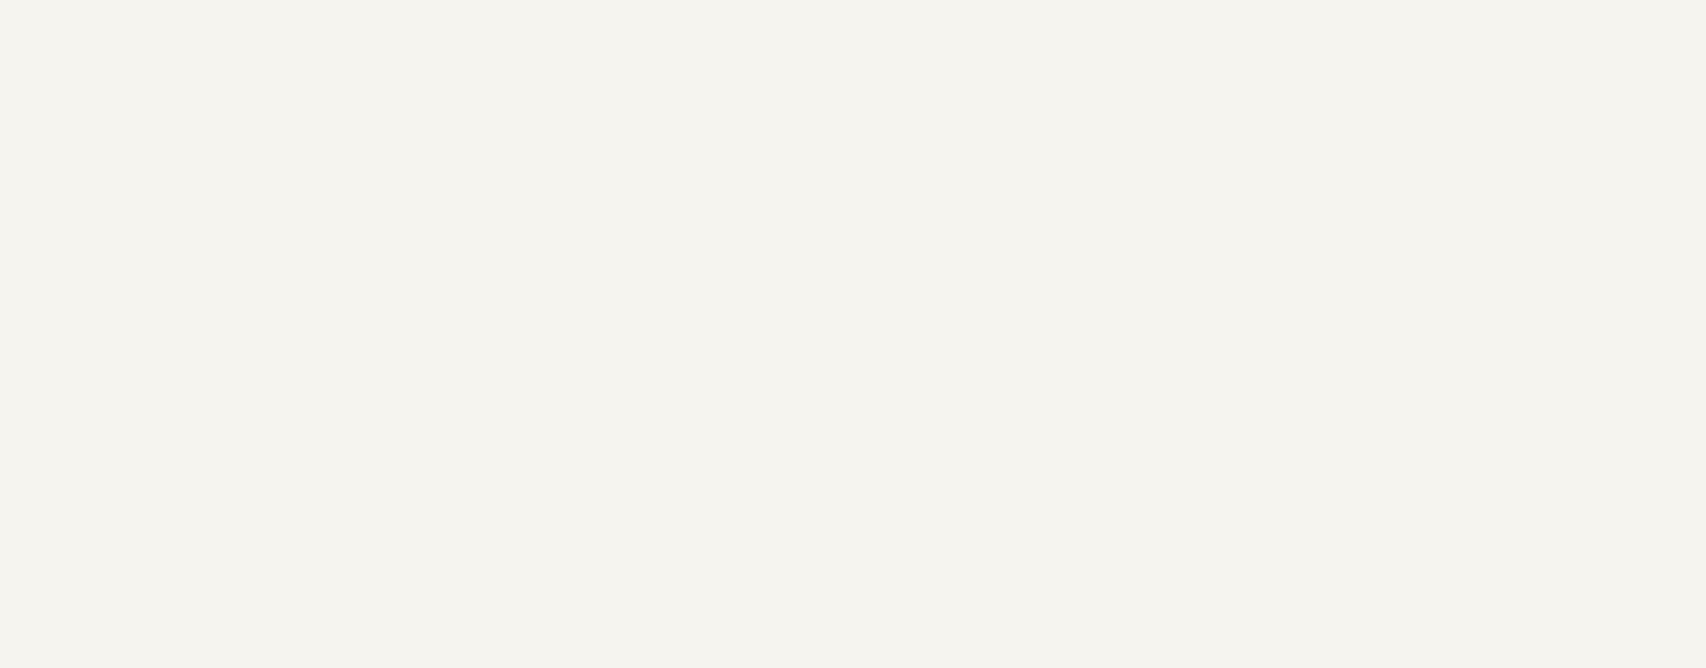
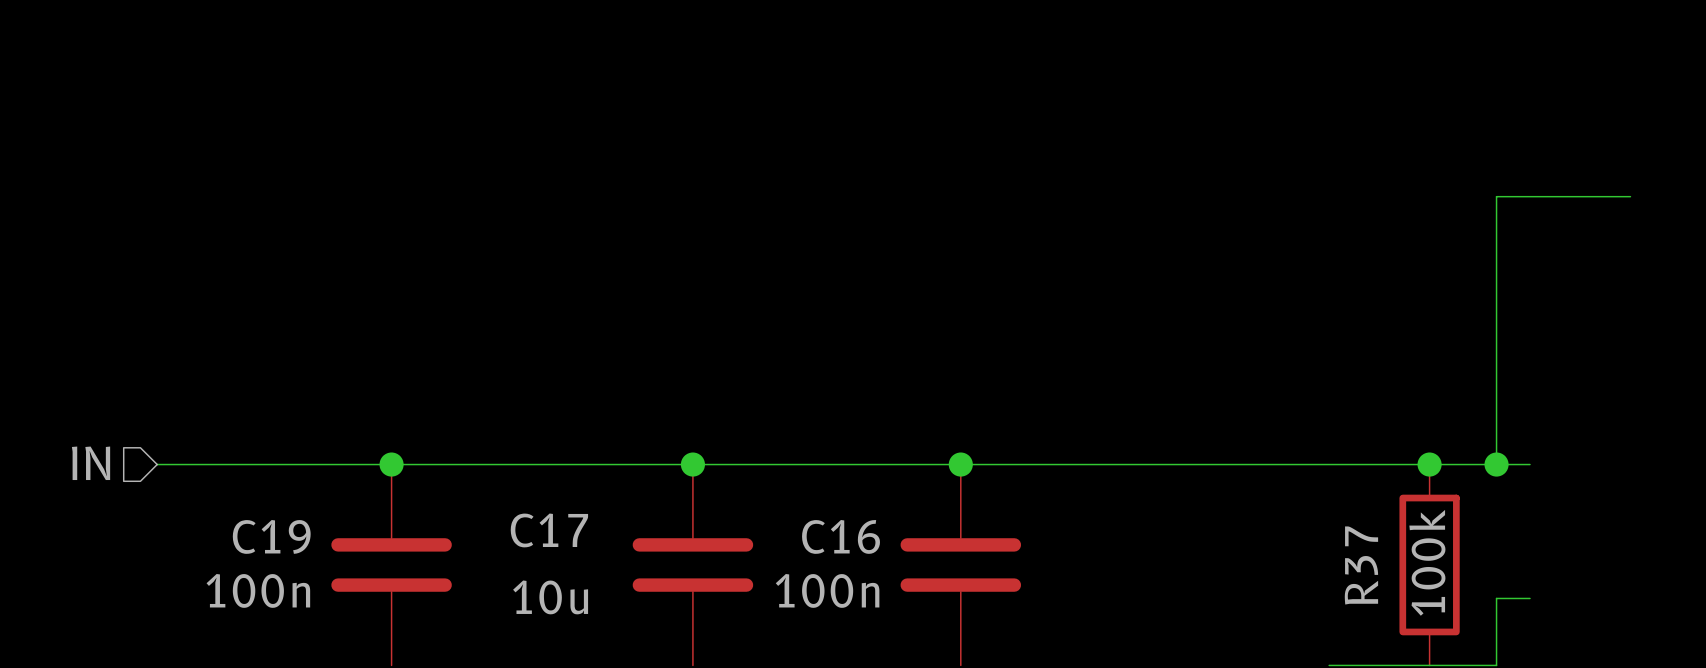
wire: none -> (1630, 196) (1496, 196) (1496, 464)
hierarchical label: none -> IN (91, 463)
wire: none -> (157, 464) (1530, 464)
junction: none -> (391, 464)
junction: none -> (692, 464)
junction: none -> (960, 464)
junction: none -> (1429, 464)
junction: none -> (1496, 464)
C19: none -> 100n (391, 564)
C17: none -> 10u (692, 564)
C16: none -> 100n (960, 564)
R37: none -> 100k (1429, 564)
wire: none -> (1530, 598) (1496, 598) (1496, 665) (1329, 665)

